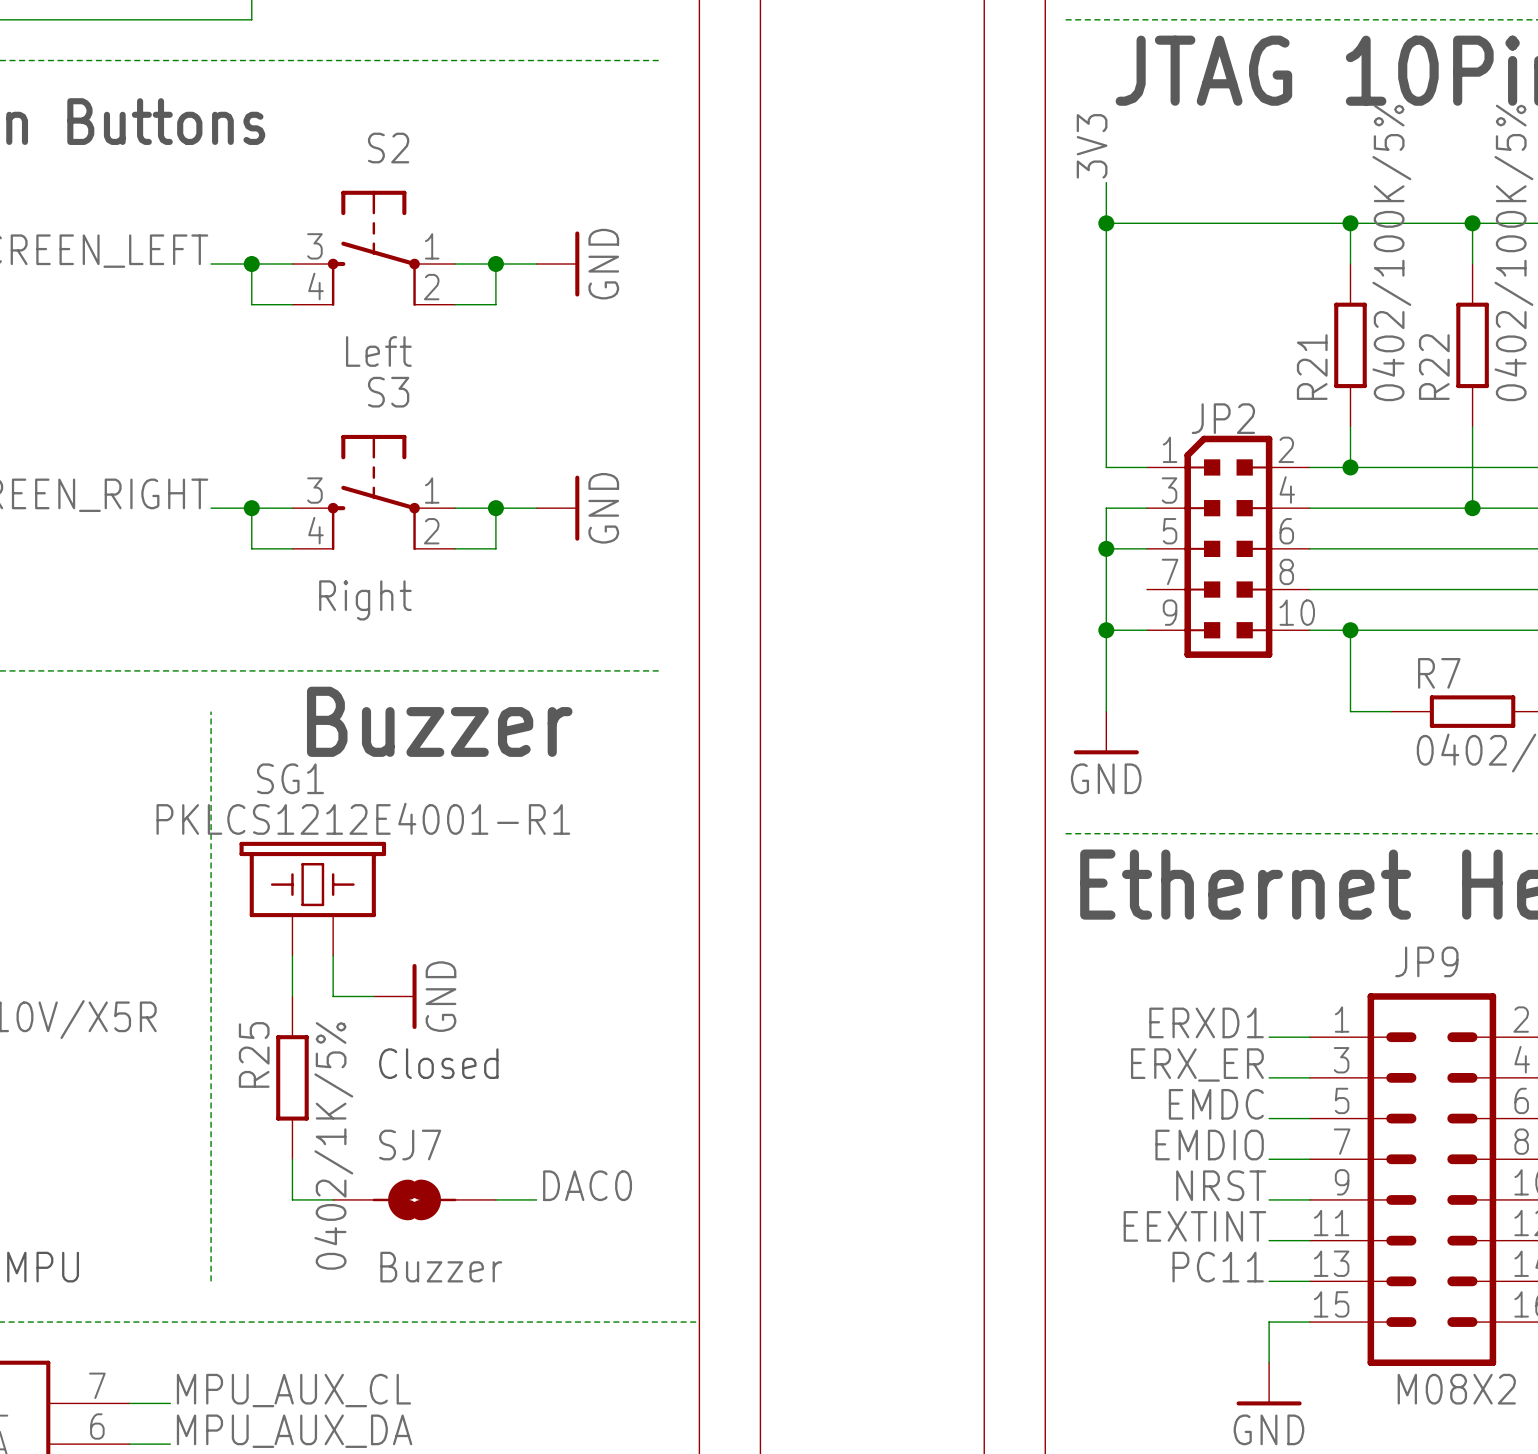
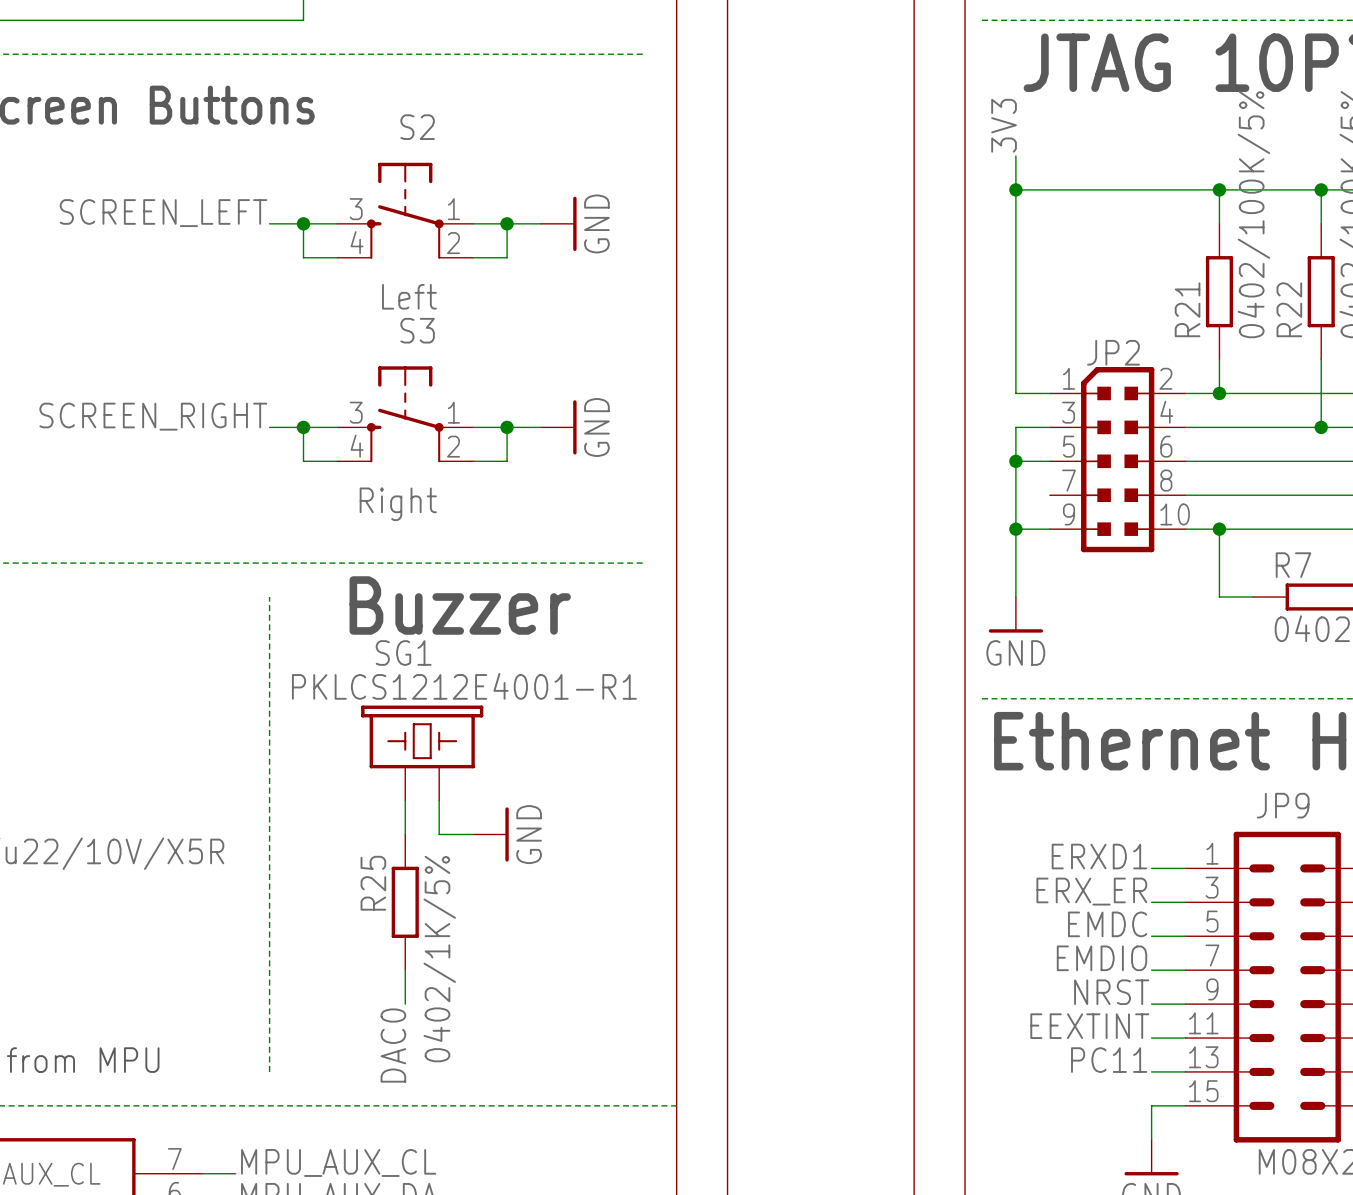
SG1 position: (312, 898) -> (422, 753)
wire: (292, 955) (292, 996) -> (405, 970) (405, 1004)
wire: (333, 955) (333, 996) (373, 996) -> (405, 800) (405, 834)
power symbol position: GND (395, 996) -> GND (490, 834)
text: Closed (438, 1063) -> none
R25 position: (292, 1077) -> (405, 902)
wire: (292, 1159) (292, 1199) (333, 1199) -> (439, 800) (439, 834) (473, 834)
label rotation: 0° (587, 1185) -> 90° counterclockwise (393, 1045)
label position: DAC0 (587, 1185) -> DAC0 (393, 1045)
SJ7: Buzzer (414, 1199) -> none
wire: (495, 1199) (536, 1199) -> none

